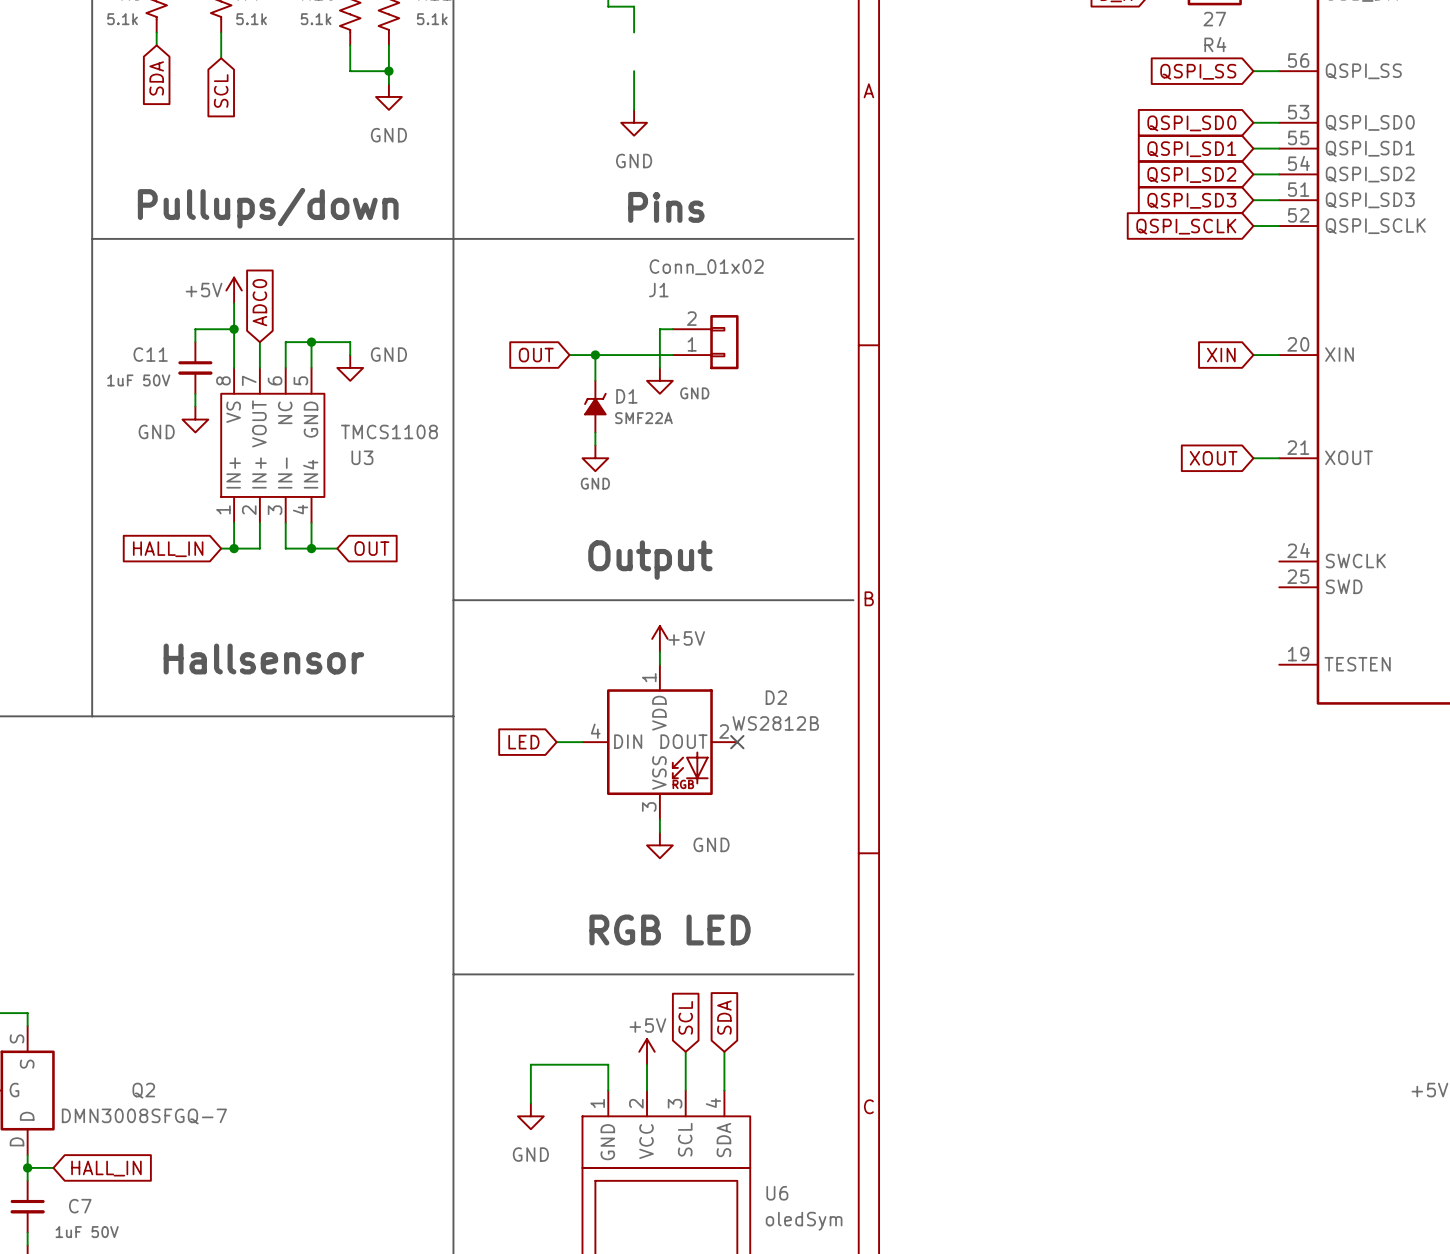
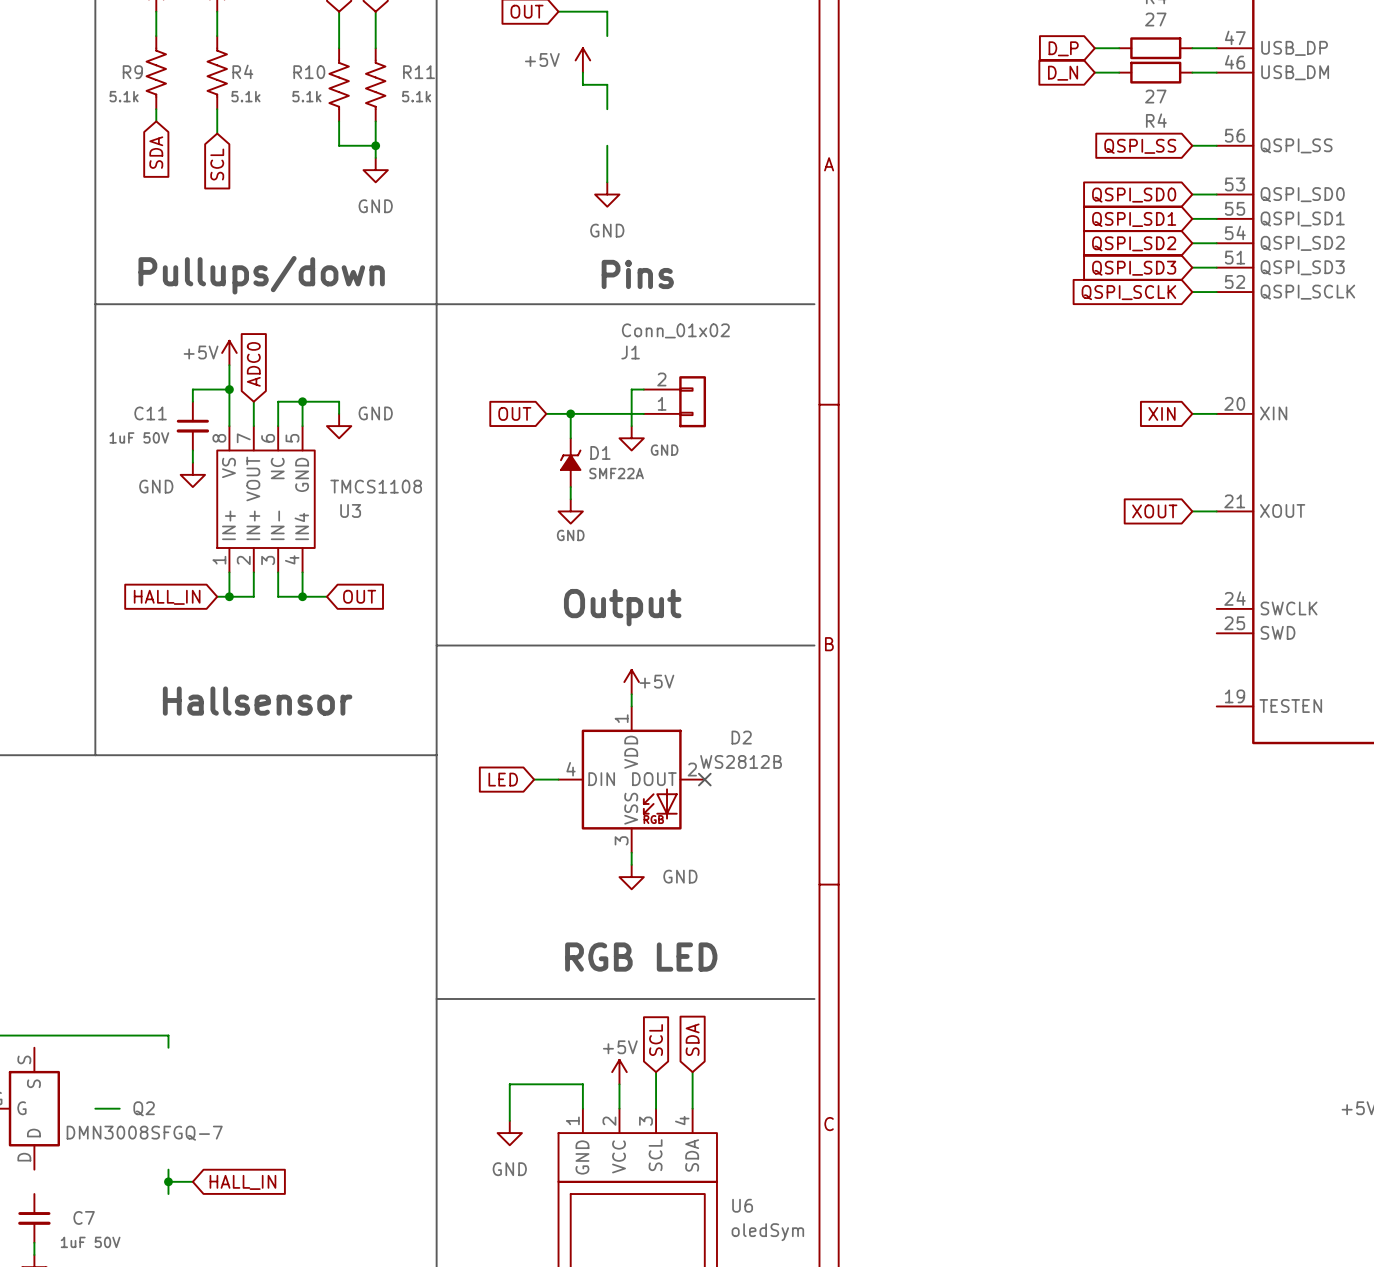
wire: (27, 1013) (27, 1026) -> (34, 1035) (168, 1035) (168, 1047)
wire: none -> (95, 1108) (119, 1108)
wire: (27, 1155) (27, 1180) -> (168, 1169) (168, 1194)
wire: (27, 1167) (53, 1167) -> (168, 1181) (192, 1181)
junction: (27, 1167) -> none
junction: none -> (168, 1181)
global label position: HALL_IN (106, 1168) -> HALL_IN (242, 1182)

